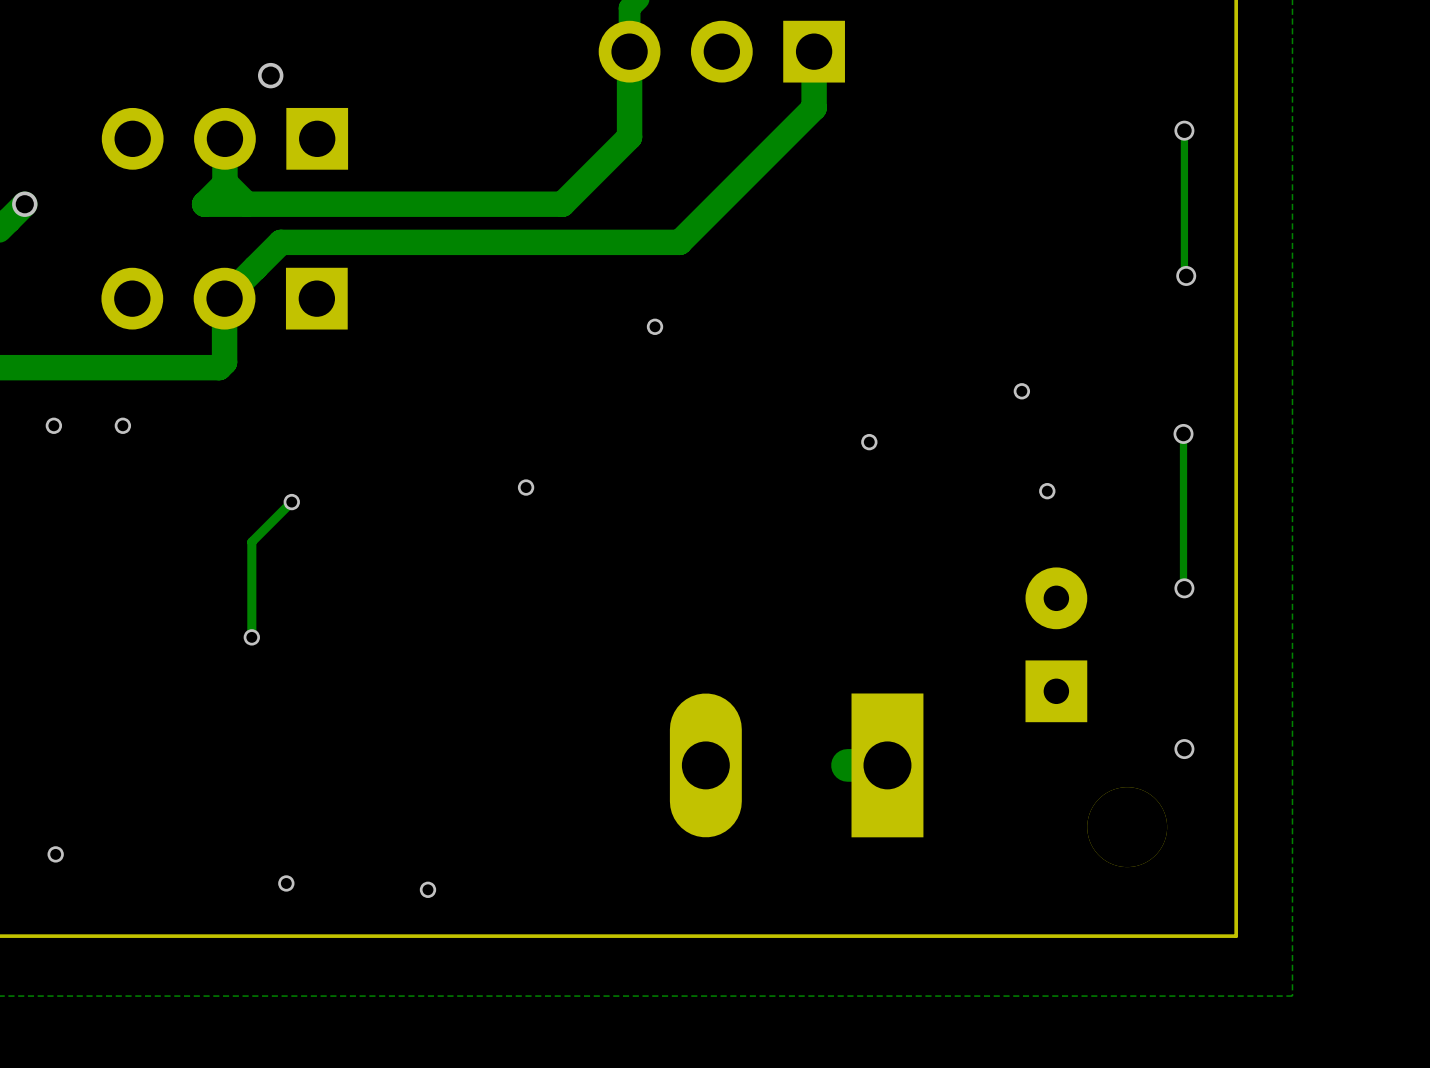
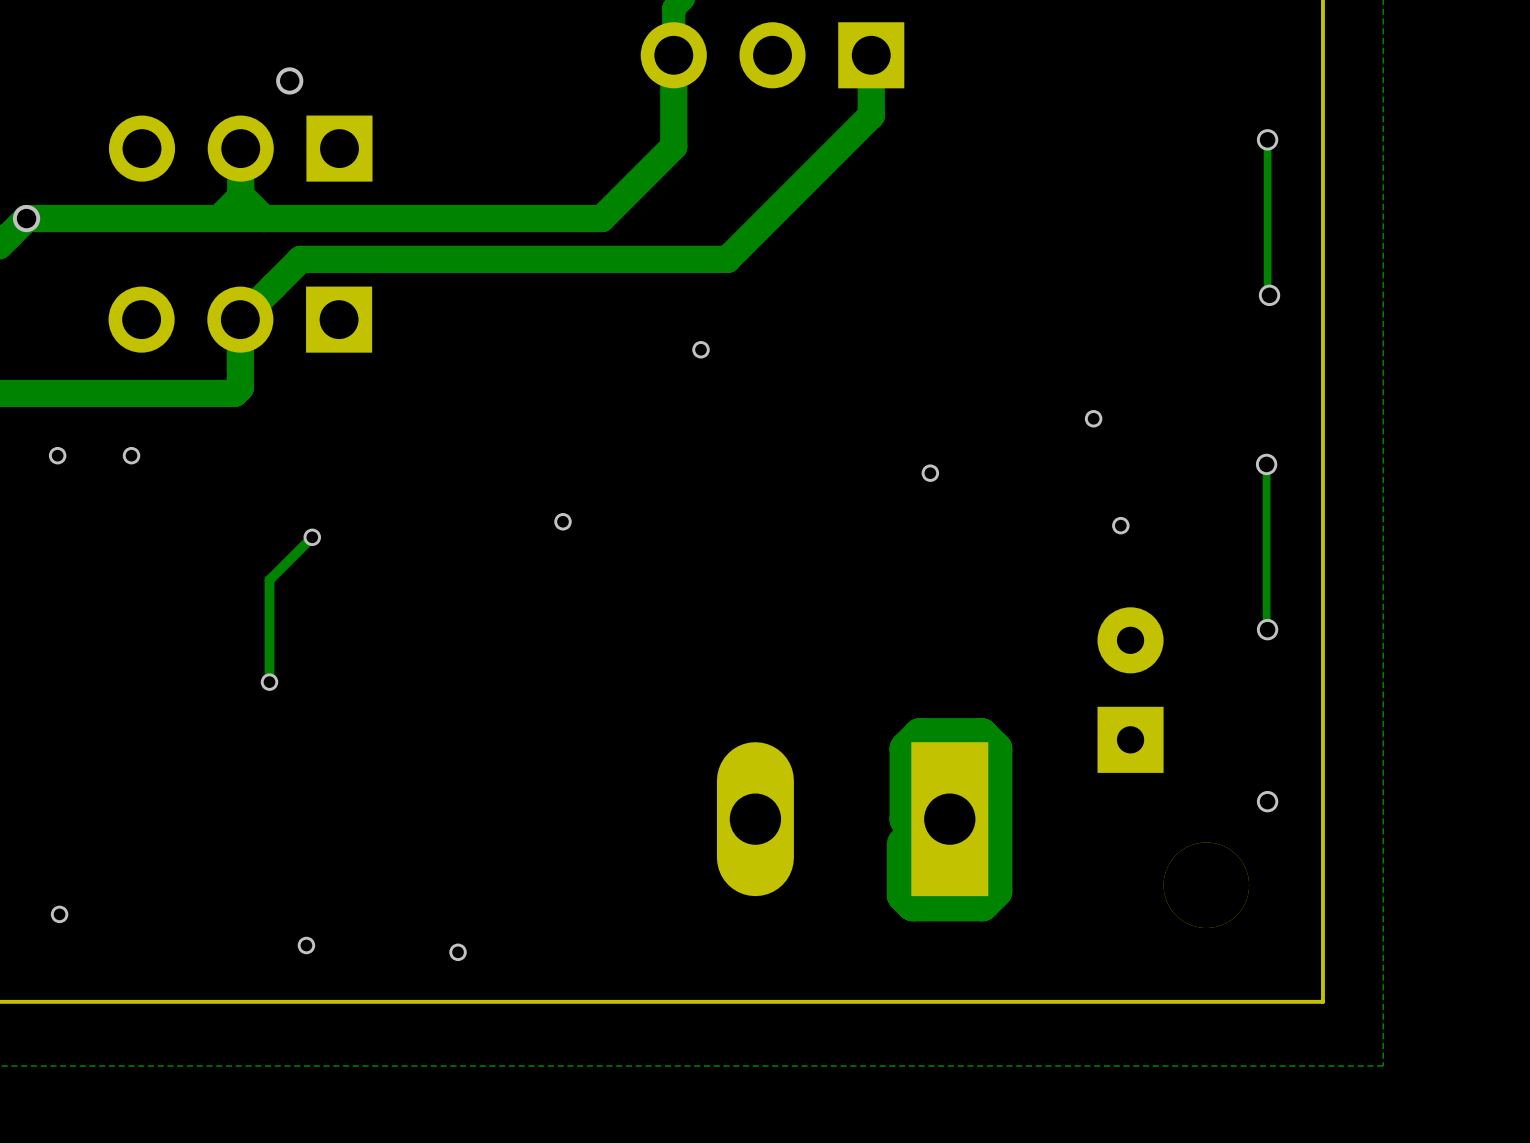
track: none -> (217, 218) (26, 218)
track: none -> (907, 819) (907, 748) (920, 735) (981, 735) (994, 749) (994, 891) (982, 903) (913, 903) (904, 894) (904, 844)

